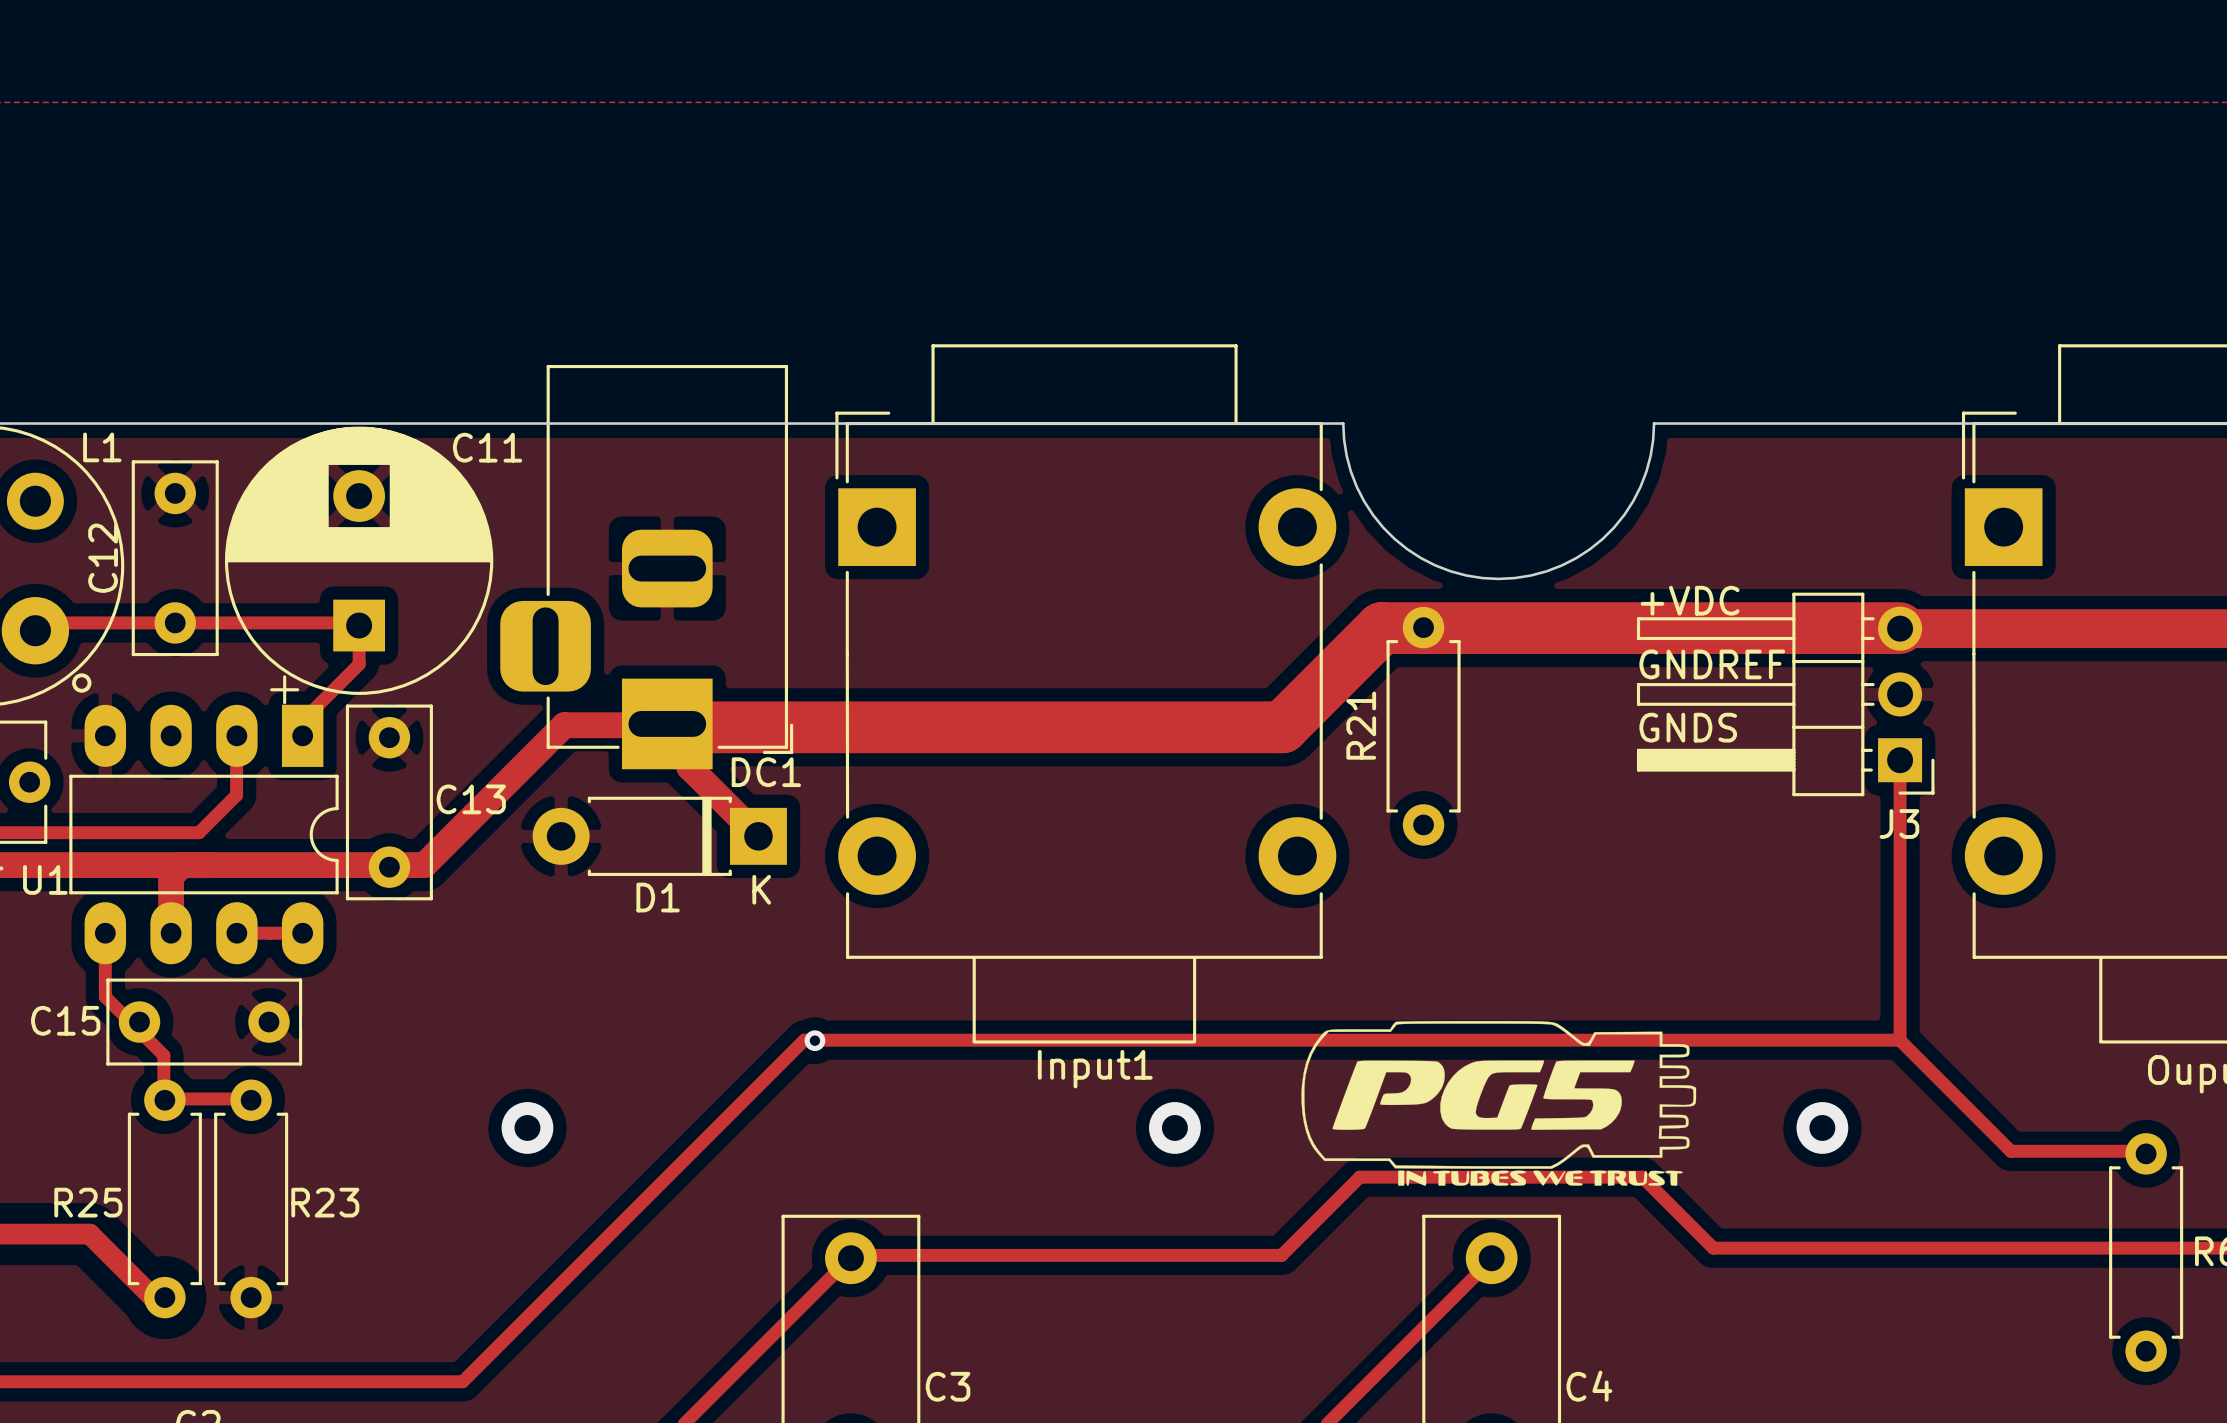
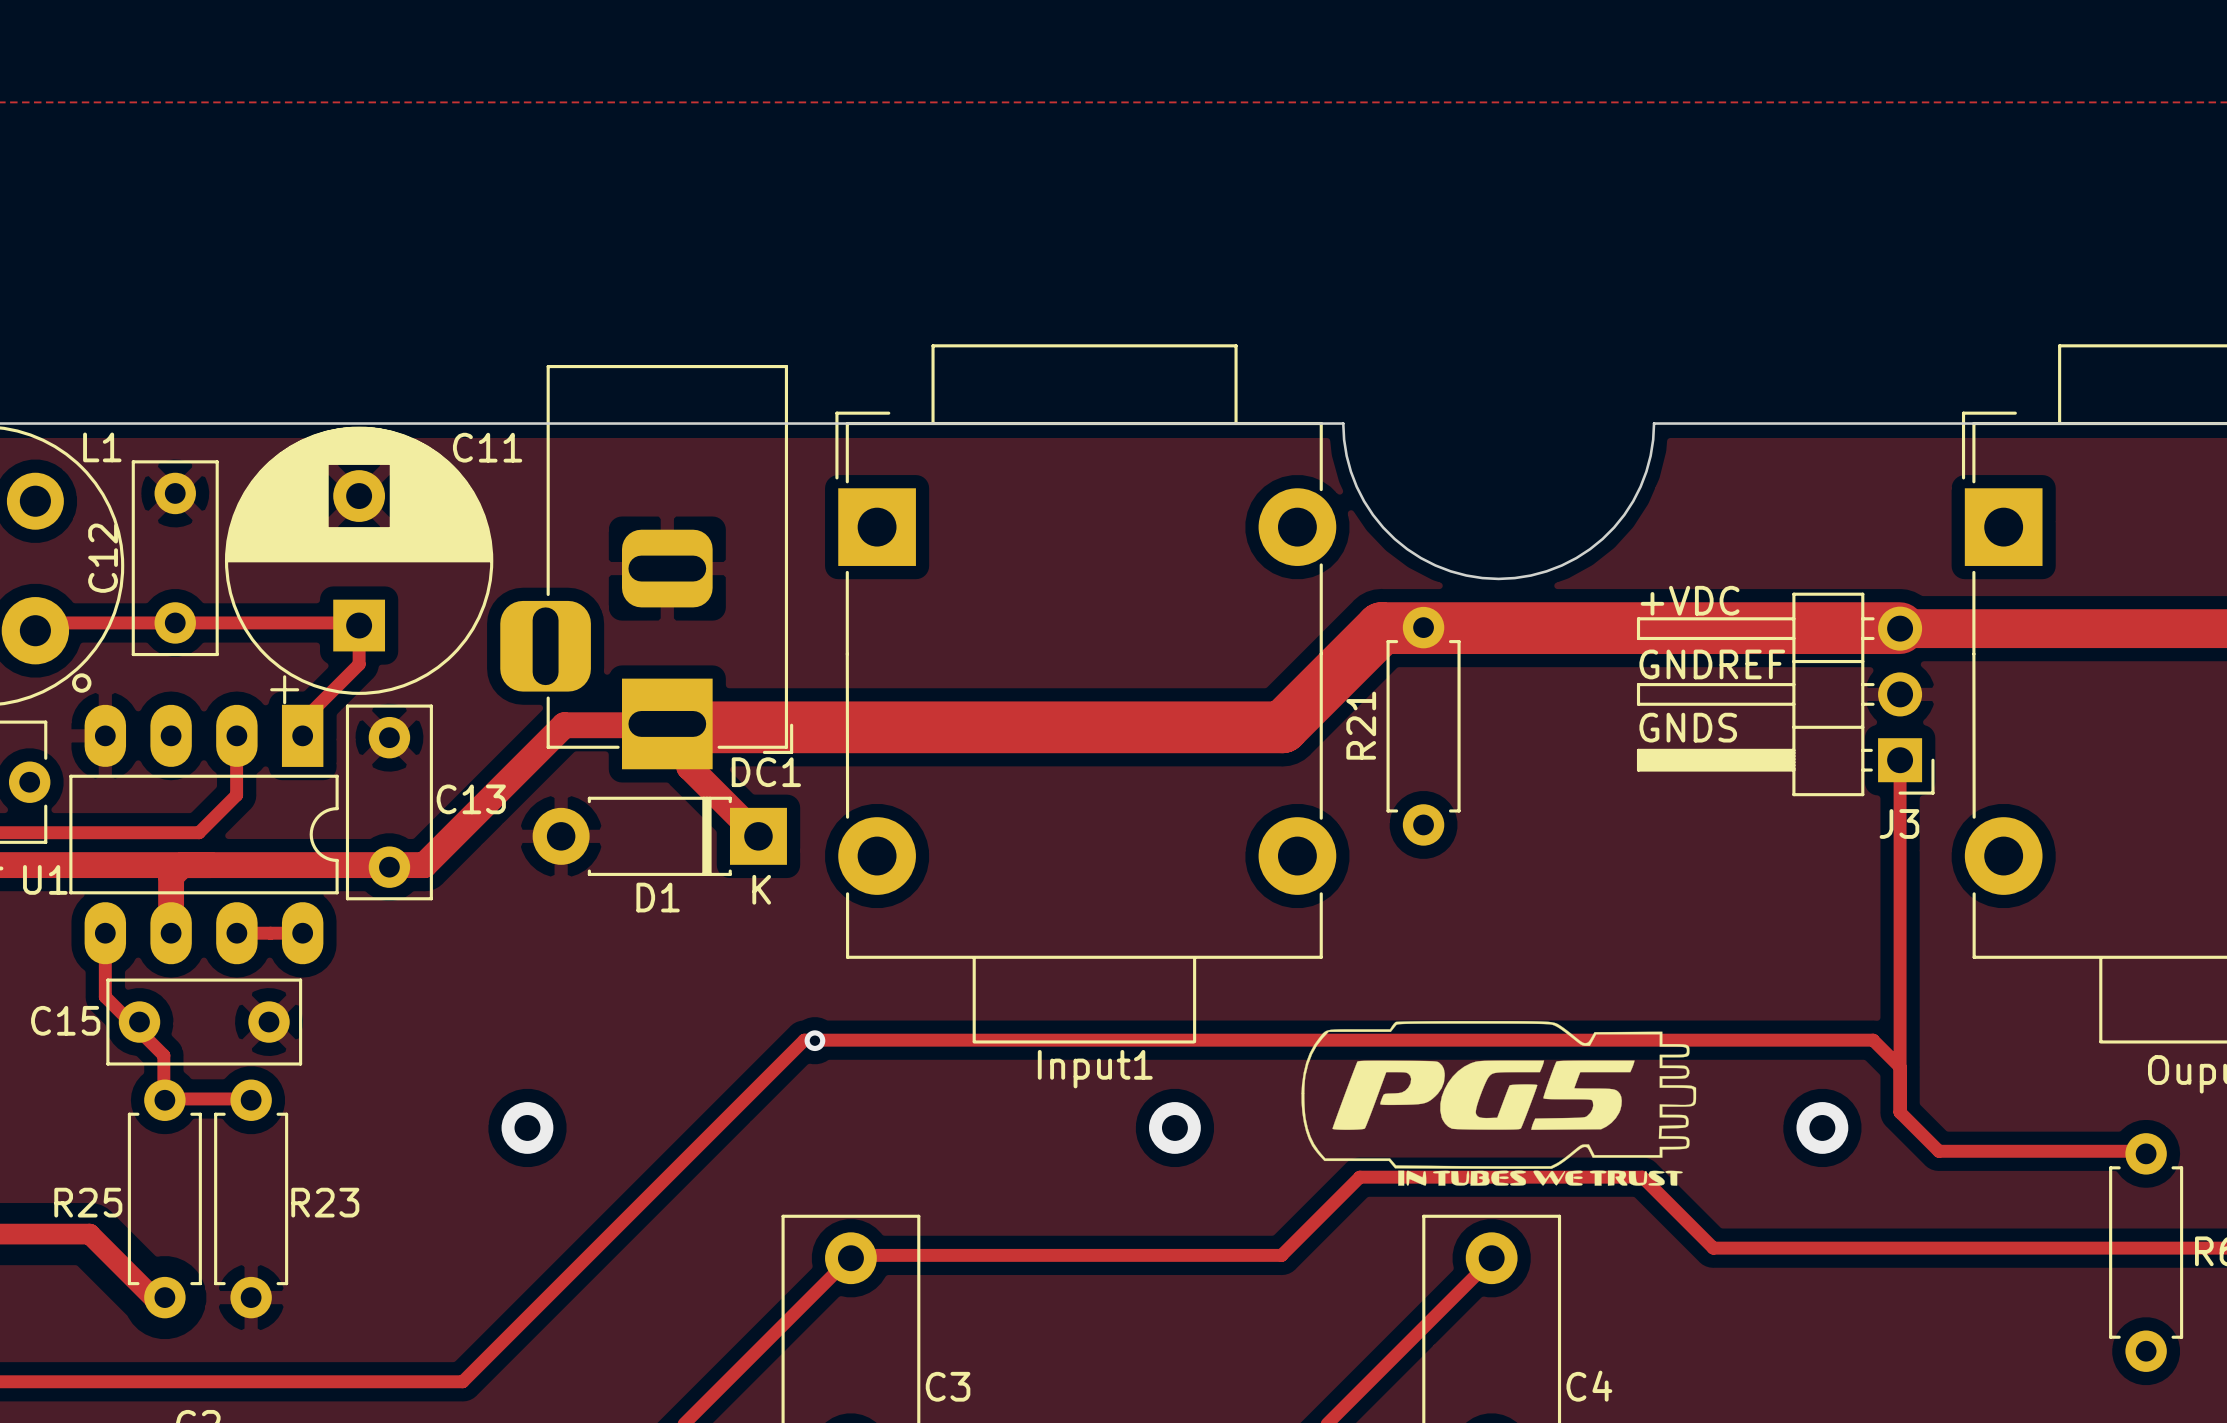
track: (1873, 1040) (1899, 1040) (2010, 1151) -> (1900, 1040) (1900, 1112) (1938, 1151) (2010, 1151)
track: none -> (1873, 1040) (1900, 1067)

